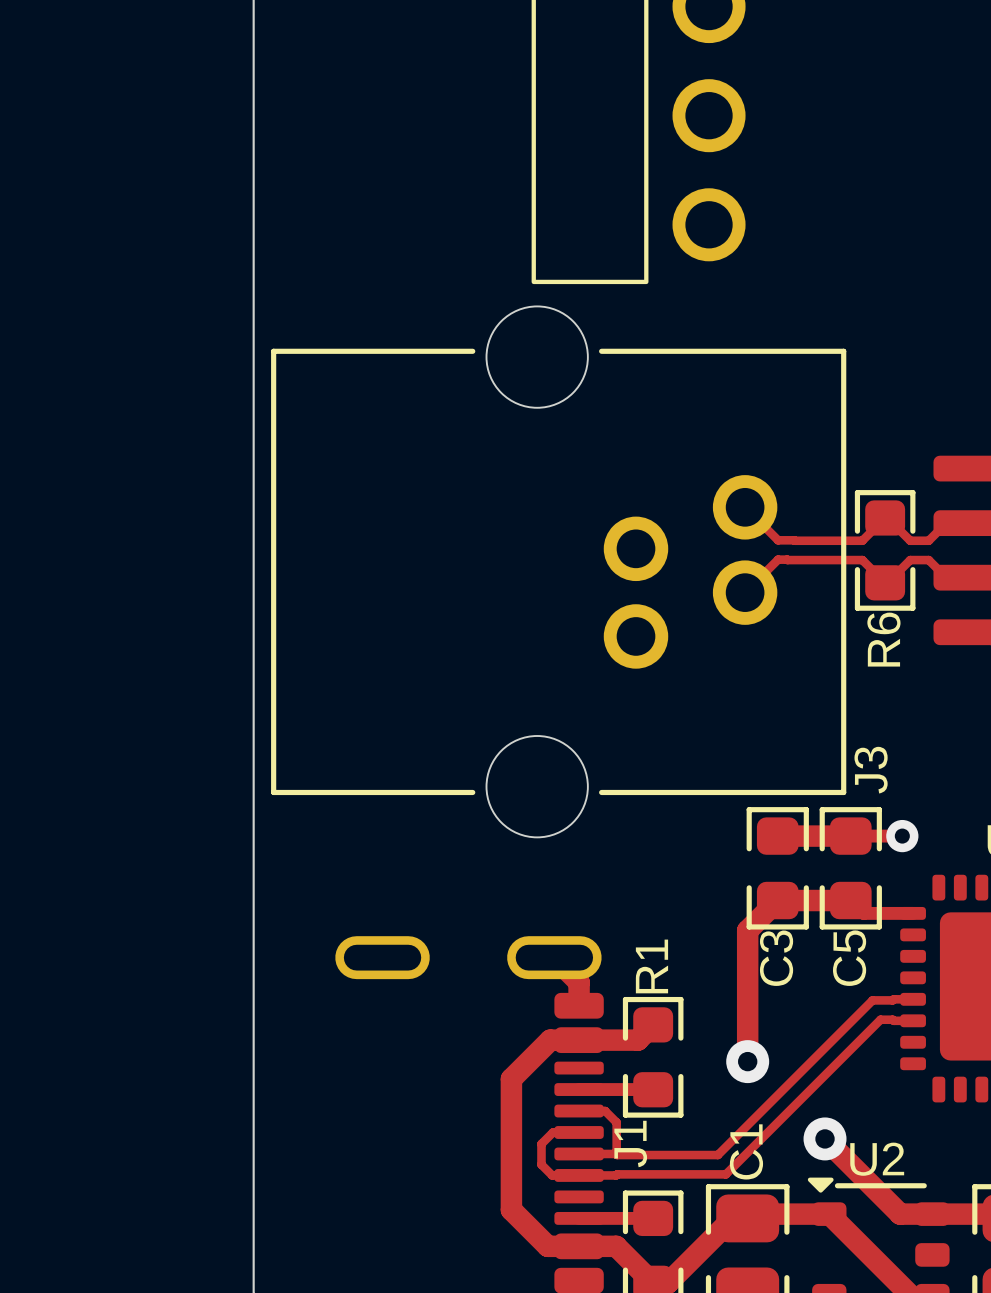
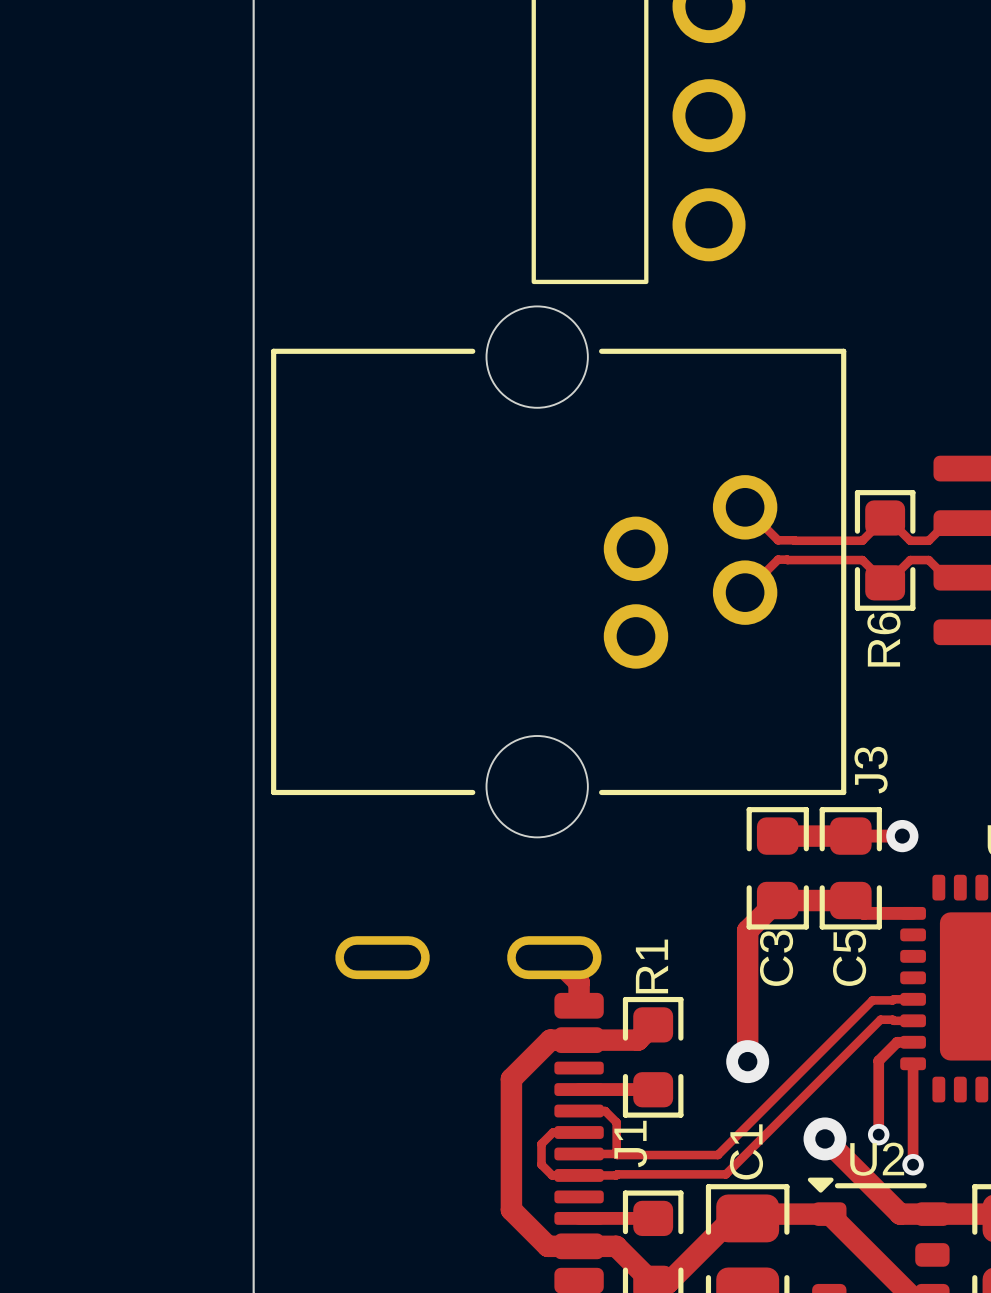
track: none -> (913, 1042) (897, 1042) (878, 1060) (878, 1134)
track: none -> (913, 1063) (913, 1164)
via: none -> (878, 1134)
via: none -> (913, 1164)

